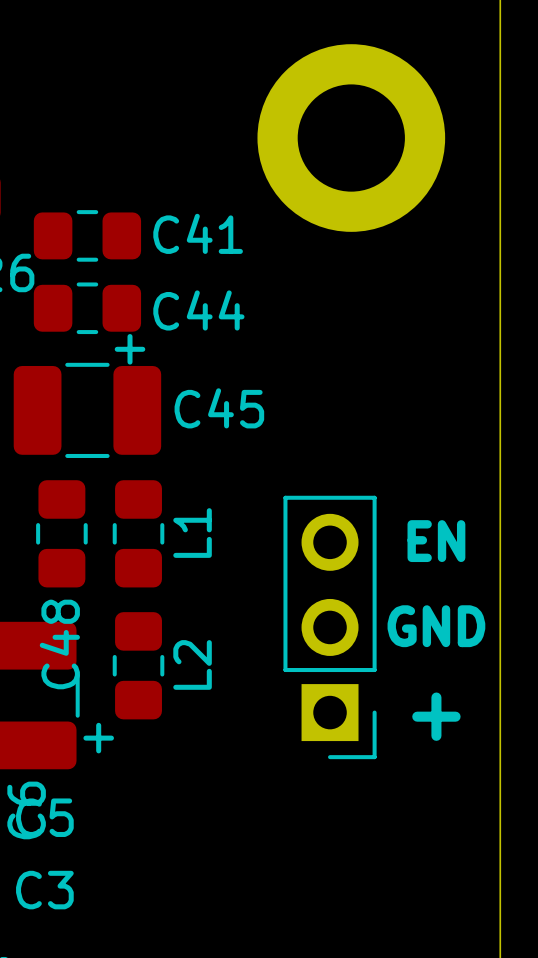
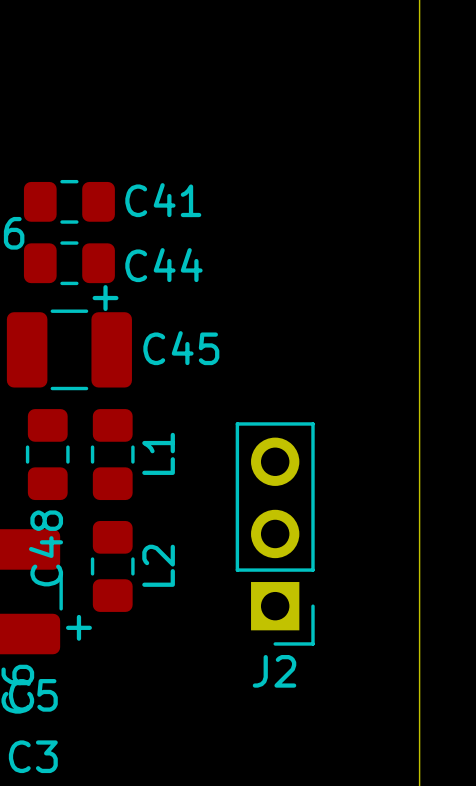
part: (351, 138) -> none
text: EN (436, 541) -> none
text: GND (436, 626) -> none
text: + (436, 716) -> none
J2 name: none -> J2 (274, 671)

